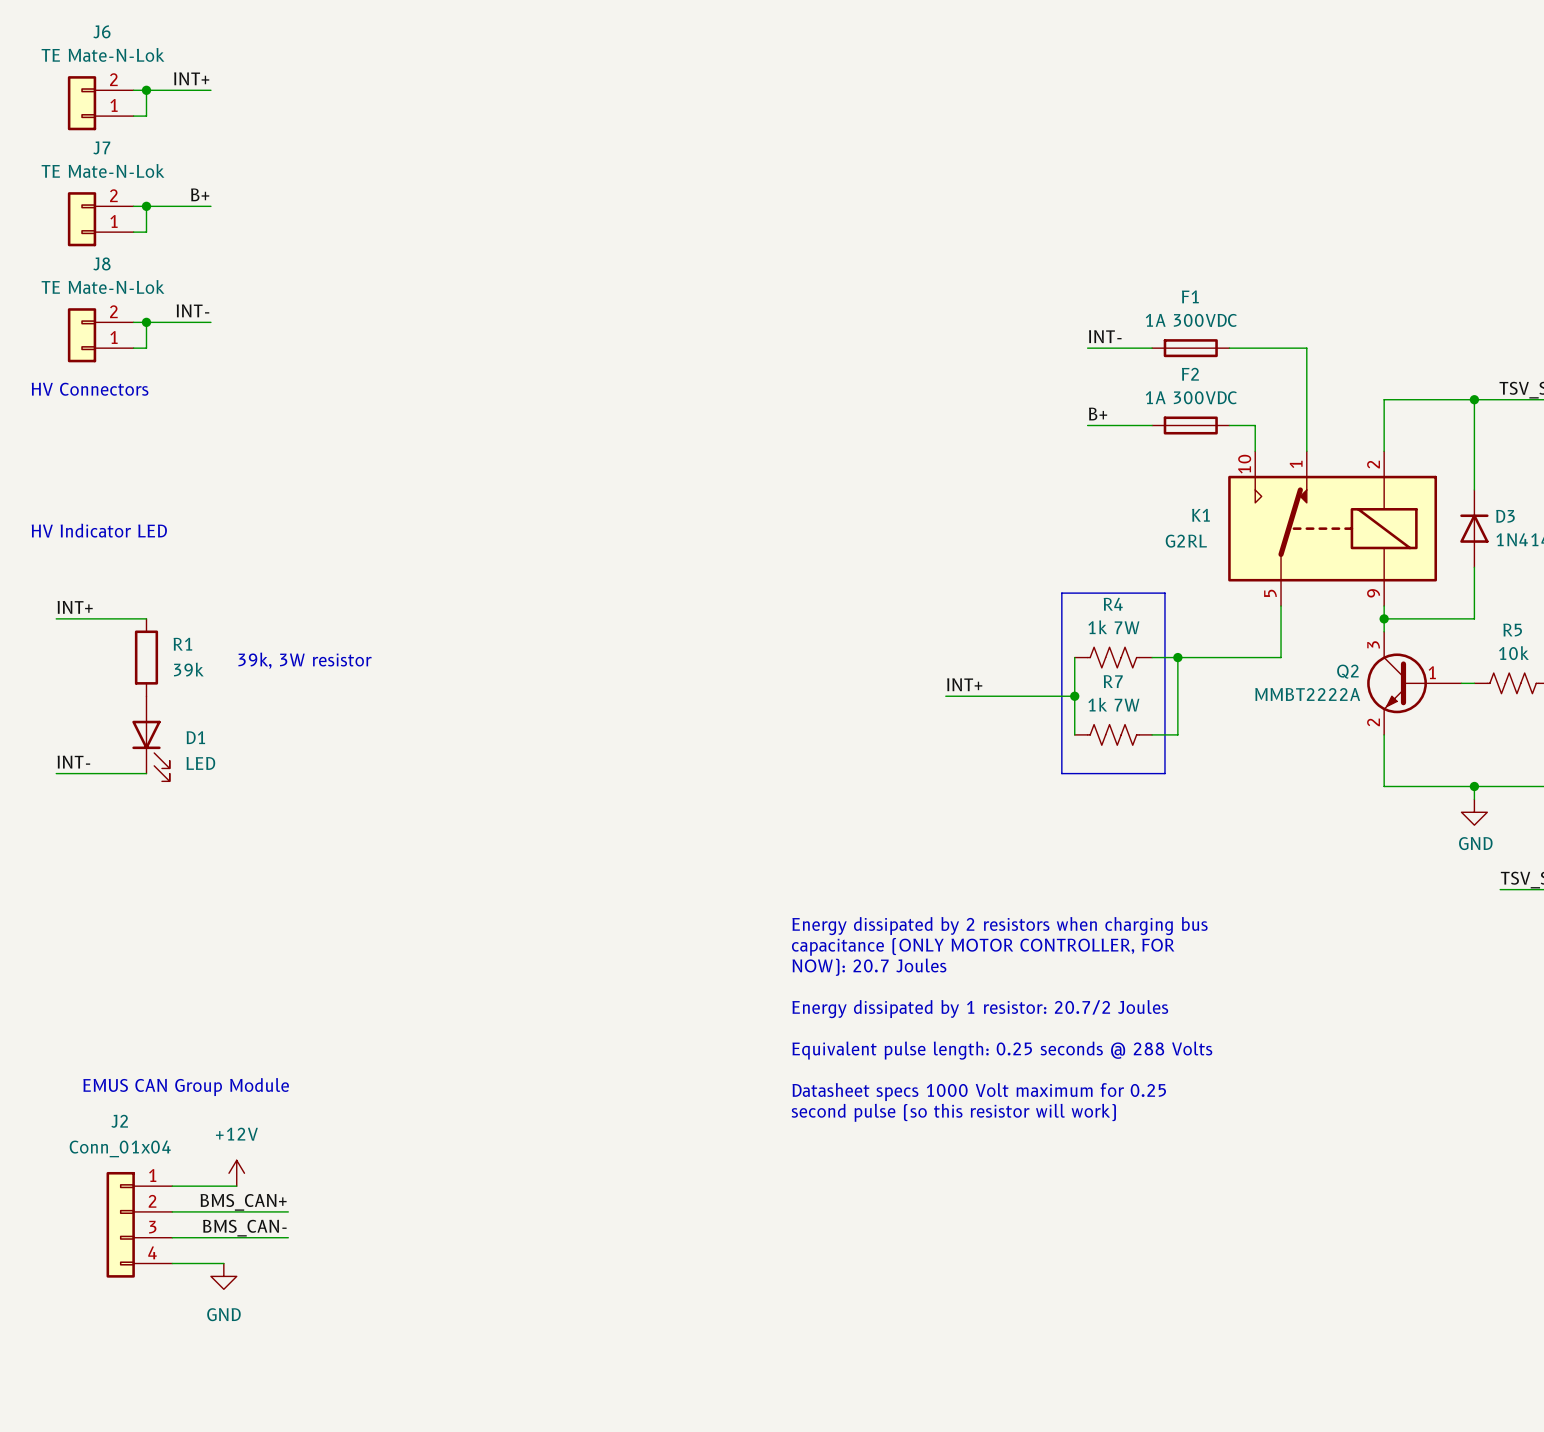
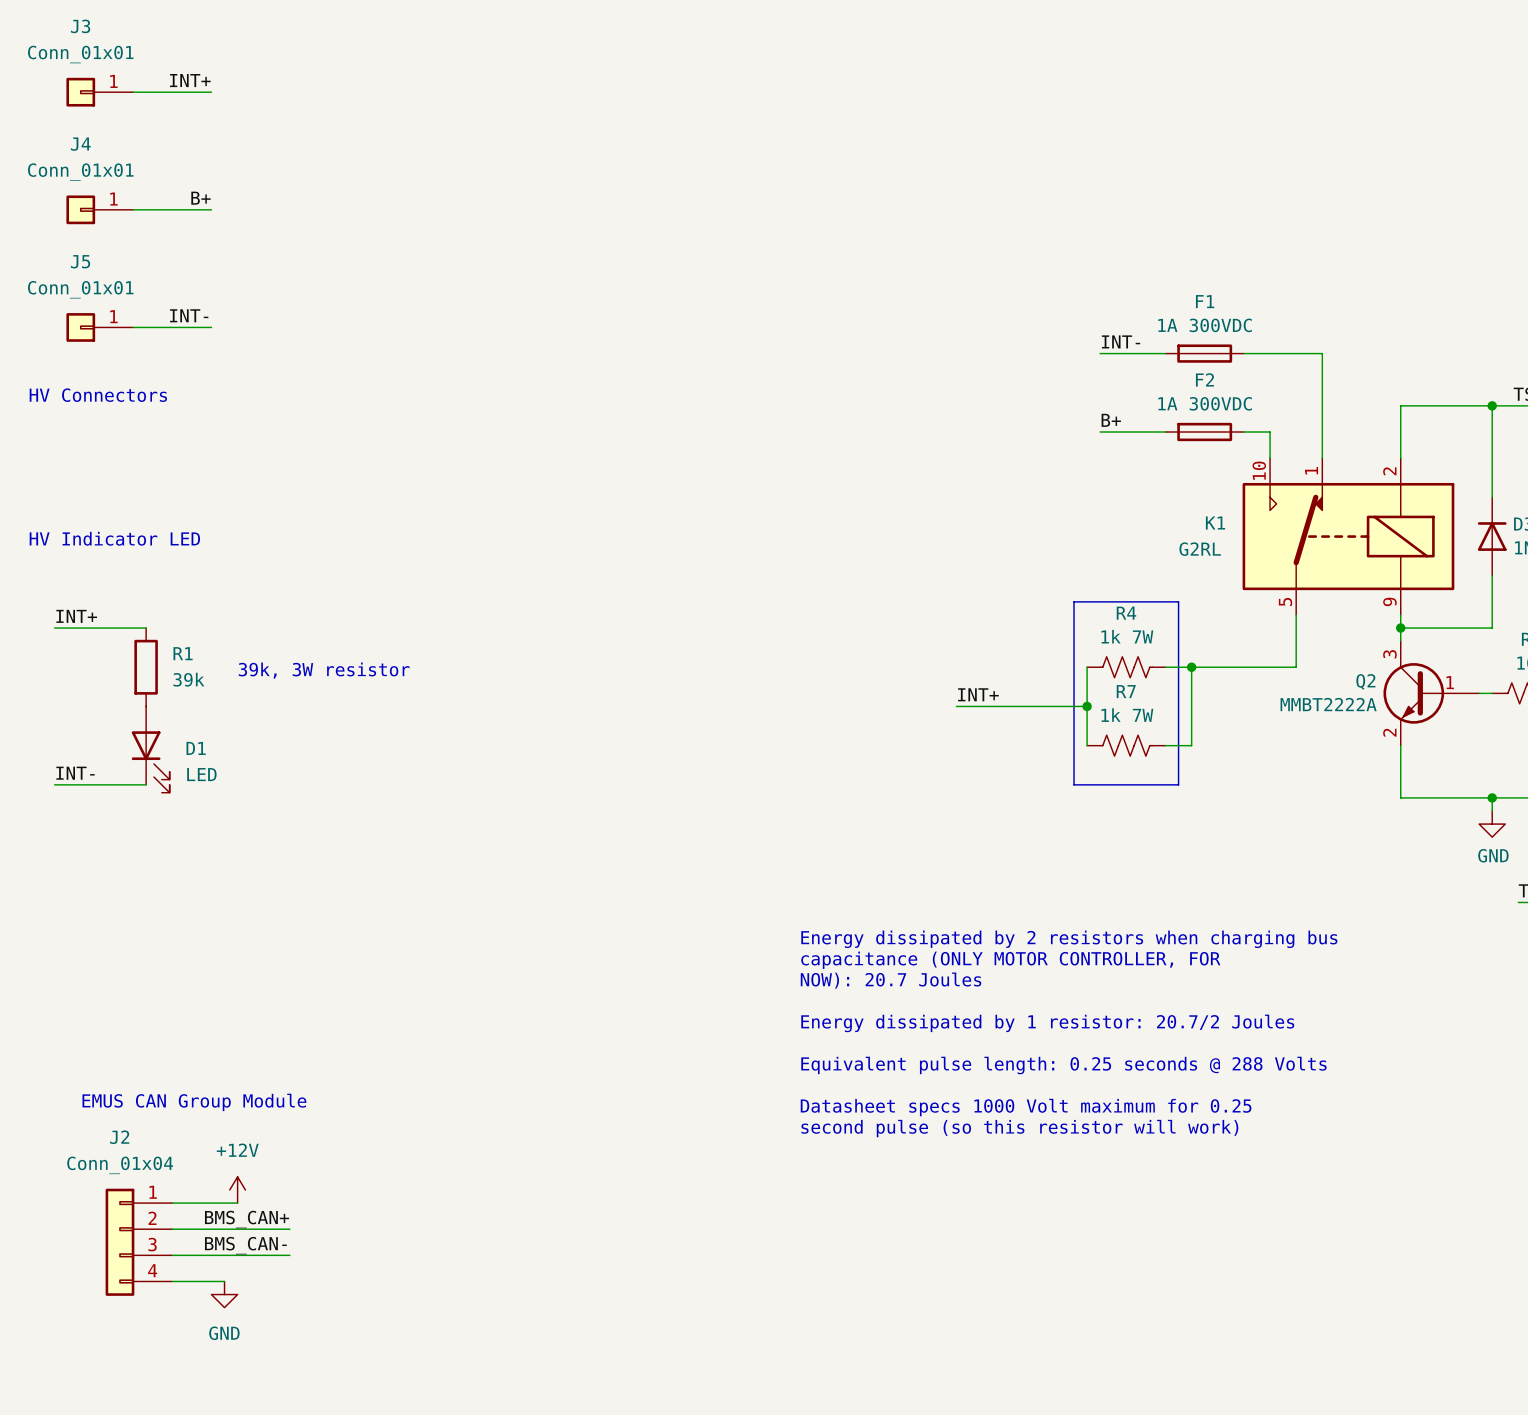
J3: none -> Conn_01x01 (99, 92)
wire: (146, 90) (146, 116) (133, 116) -> none
junction: (146, 90) -> none
J6: TE Mate-N-Lok (100, 103) -> none
J4: none -> Conn_01x01 (99, 209)
wire: (146, 206) (146, 232) (133, 232) -> none
junction: (146, 206) -> none
J7: TE Mate-N-Lok (100, 219) -> none
J5: none -> Conn_01x01 (99, 327)
wire: (146, 322) (146, 348) (133, 348) -> none
junction: (146, 322) -> none
J8: TE Mate-N-Lok (100, 335) -> none

